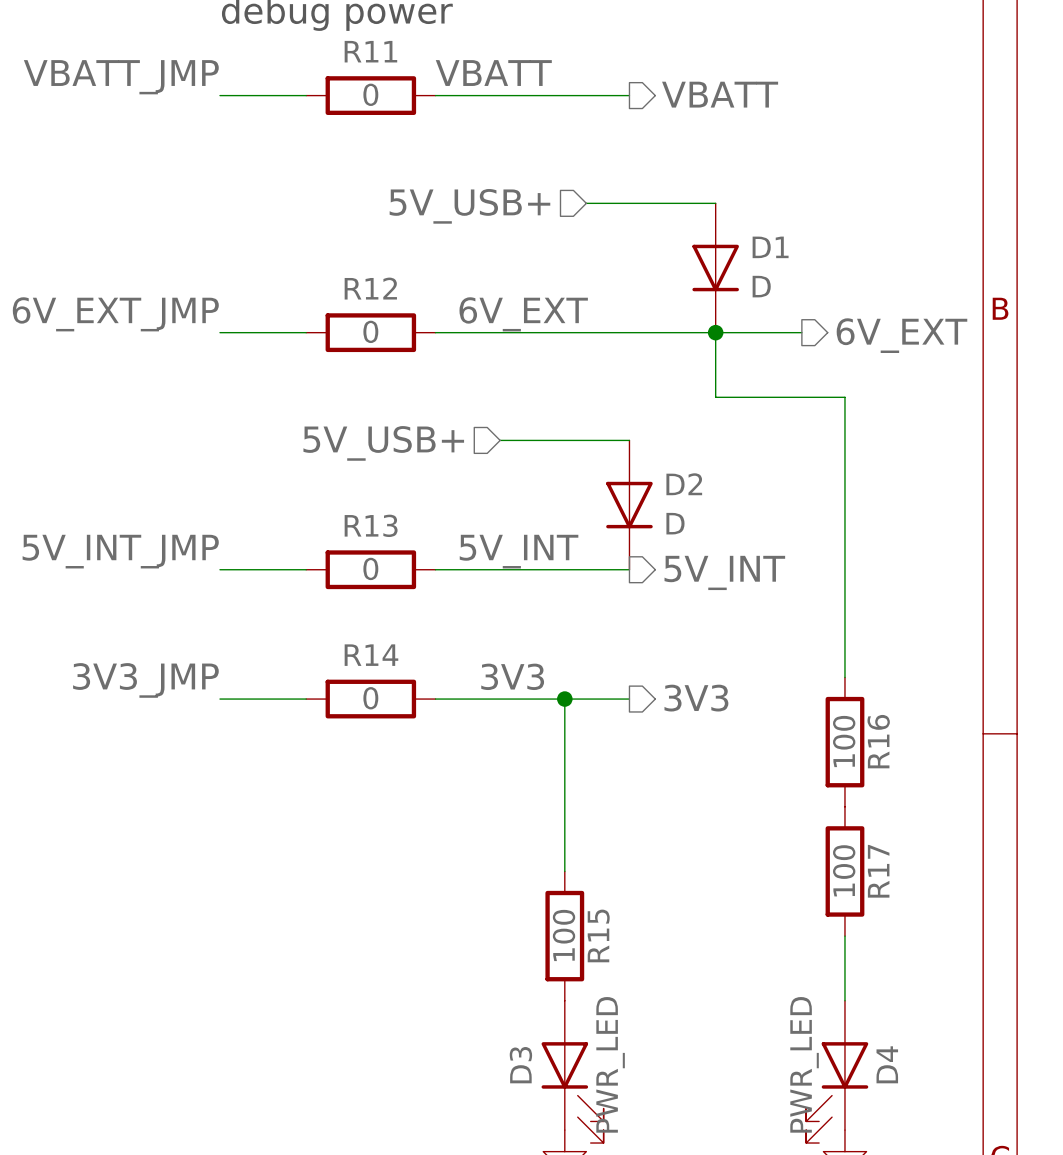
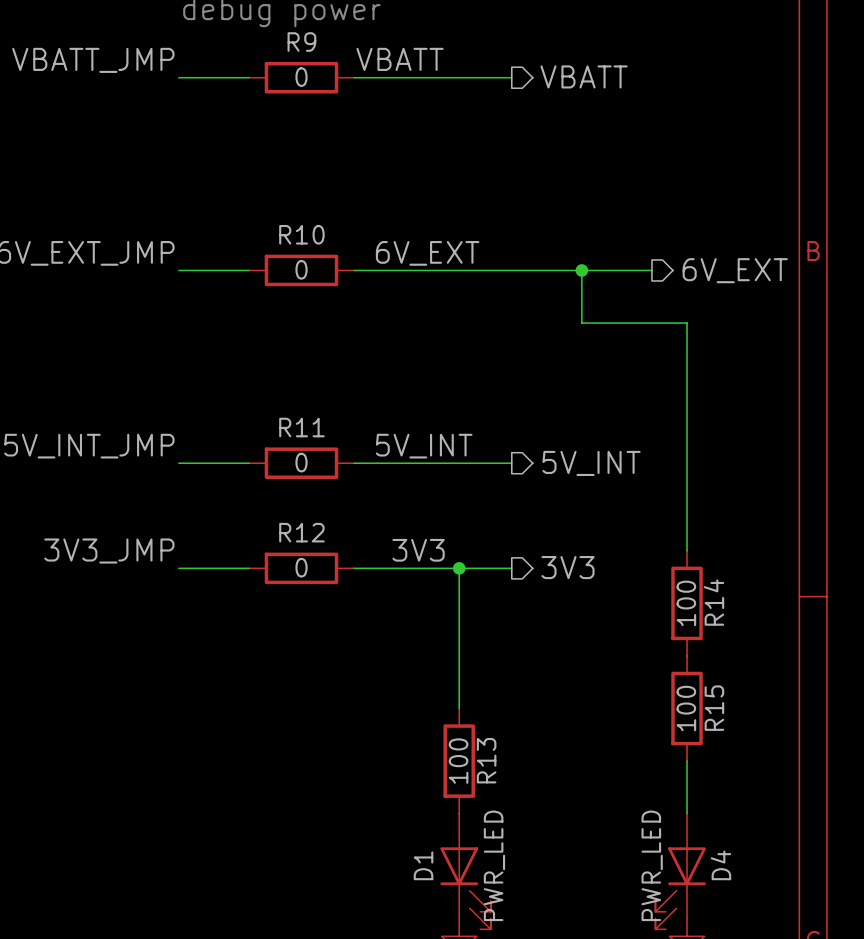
R11 name: R11 (370, 51) -> R9 (301, 42)
wire: (586, 203) (715, 203) -> none
hierarchical label: 5V_USB+ (469, 206) -> none
D1: D (715, 268) -> none
R12 name: R12 (370, 288) -> R10 (301, 234)
wire: (500, 440) (629, 440) -> none
hierarchical label: 5V_USB+ (383, 443) -> none
D2: D (629, 505) -> none
R13 name: R13 (371, 525) -> R11 (301, 427)
R14 name: R14 (371, 655) -> R12 (301, 532)
R16 name: R16 (878, 741) -> R14 (713, 602)
R17 name: R17 (878, 871) -> R15 (714, 708)
R15 name: R15 (598, 935) -> R13 (486, 760)
D3 name: D3 (520, 1065) -> D1 (423, 865)

